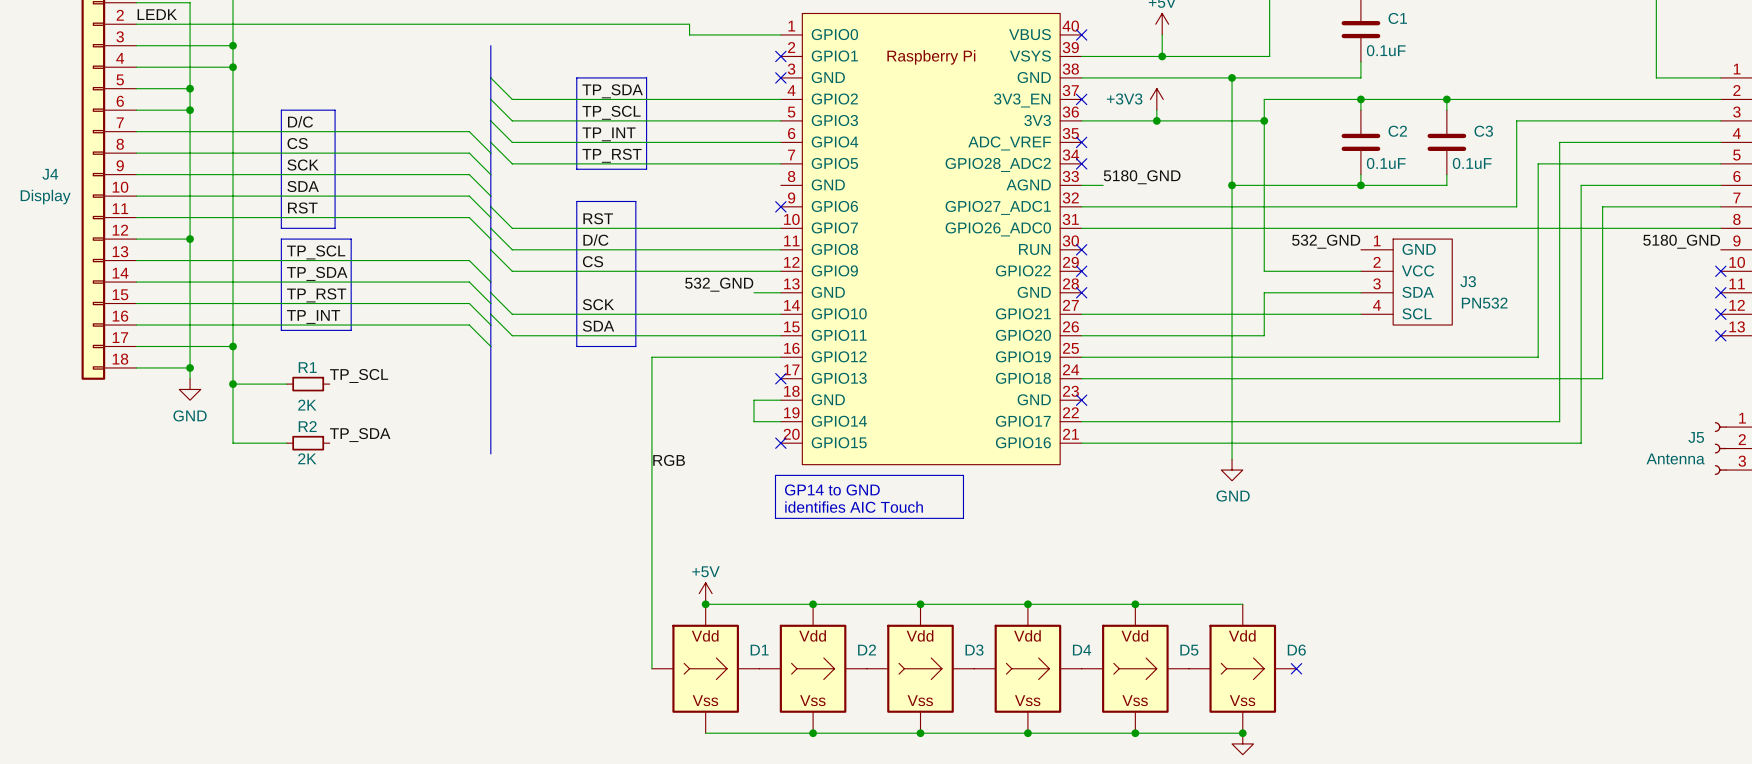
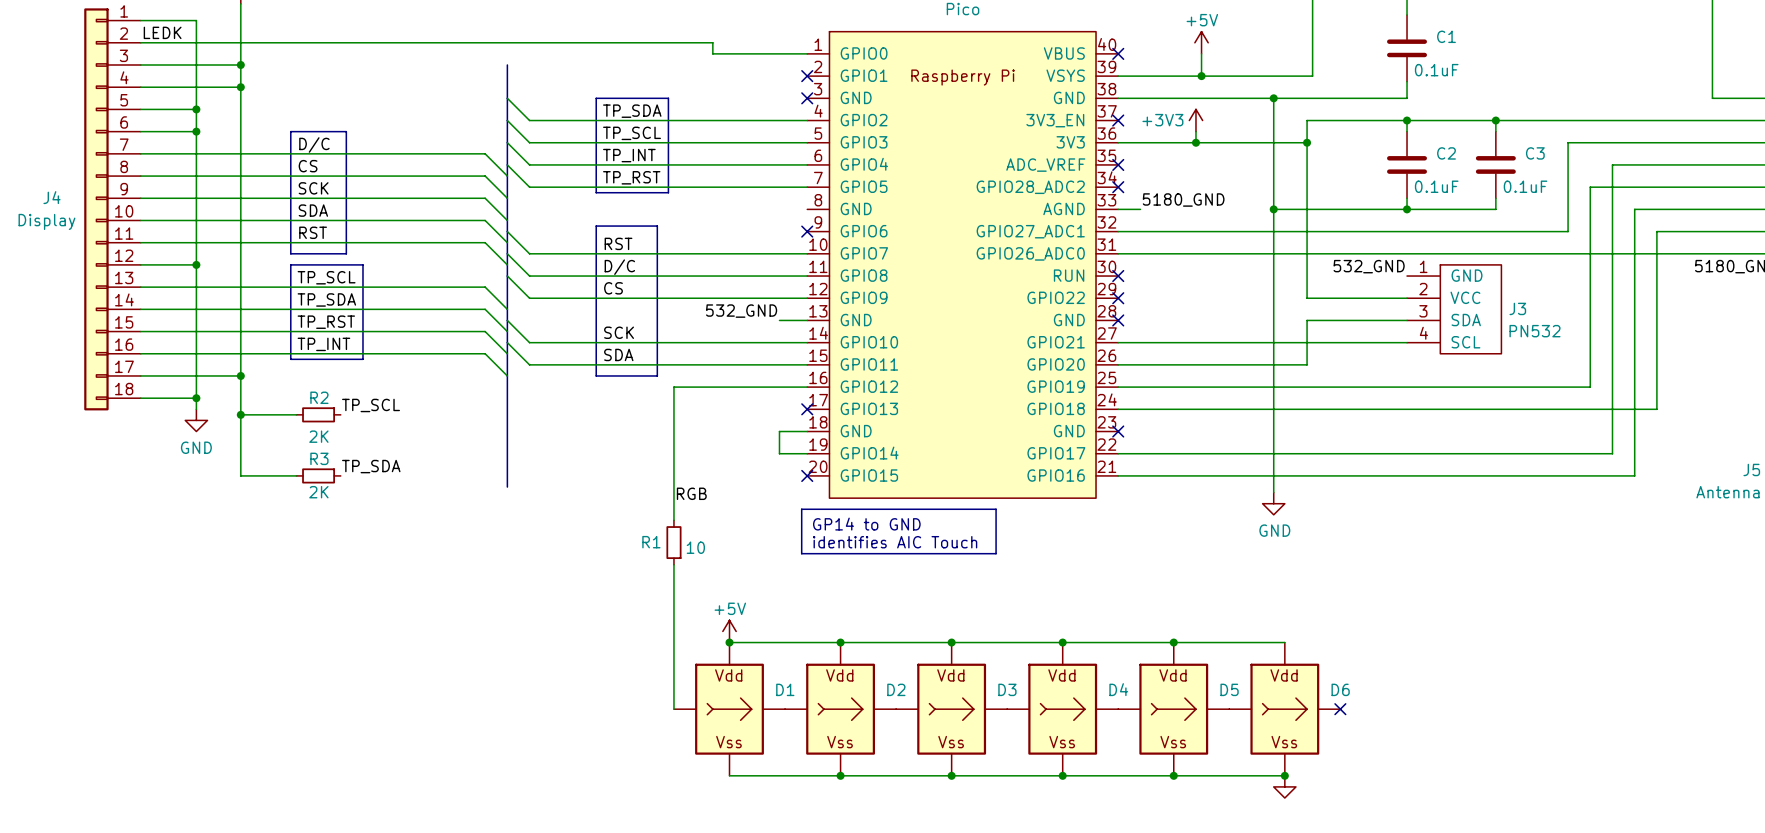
R1 name: R1 (307, 367) -> R2 (319, 397)
R2 name: R2 (307, 426) -> R3 (319, 458)
wire: (651, 486) (651, 529) -> none
R1: none -> 10 (673, 542)

